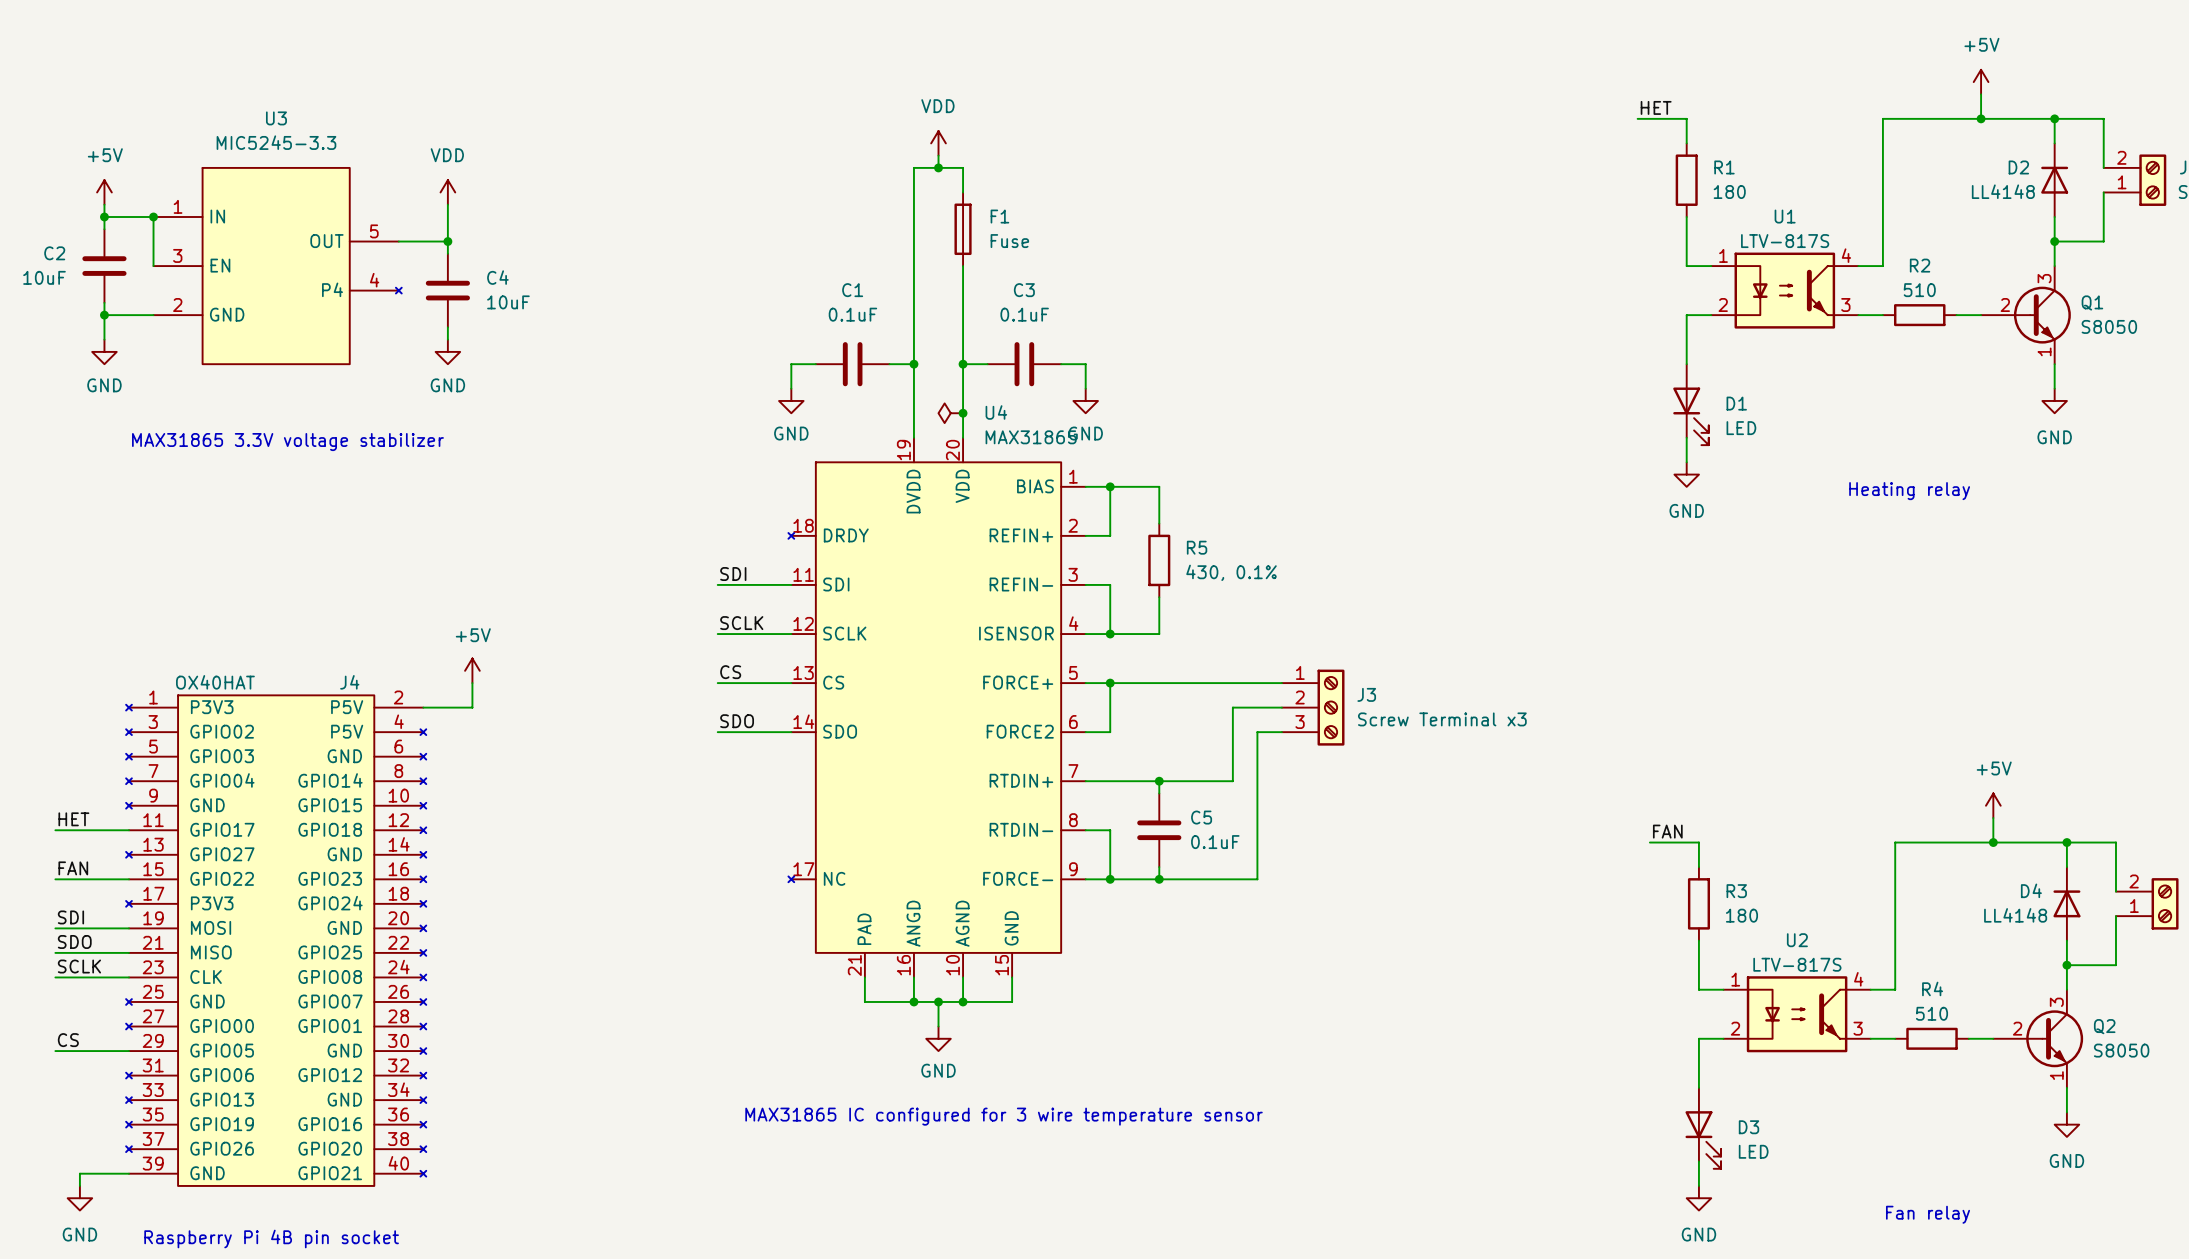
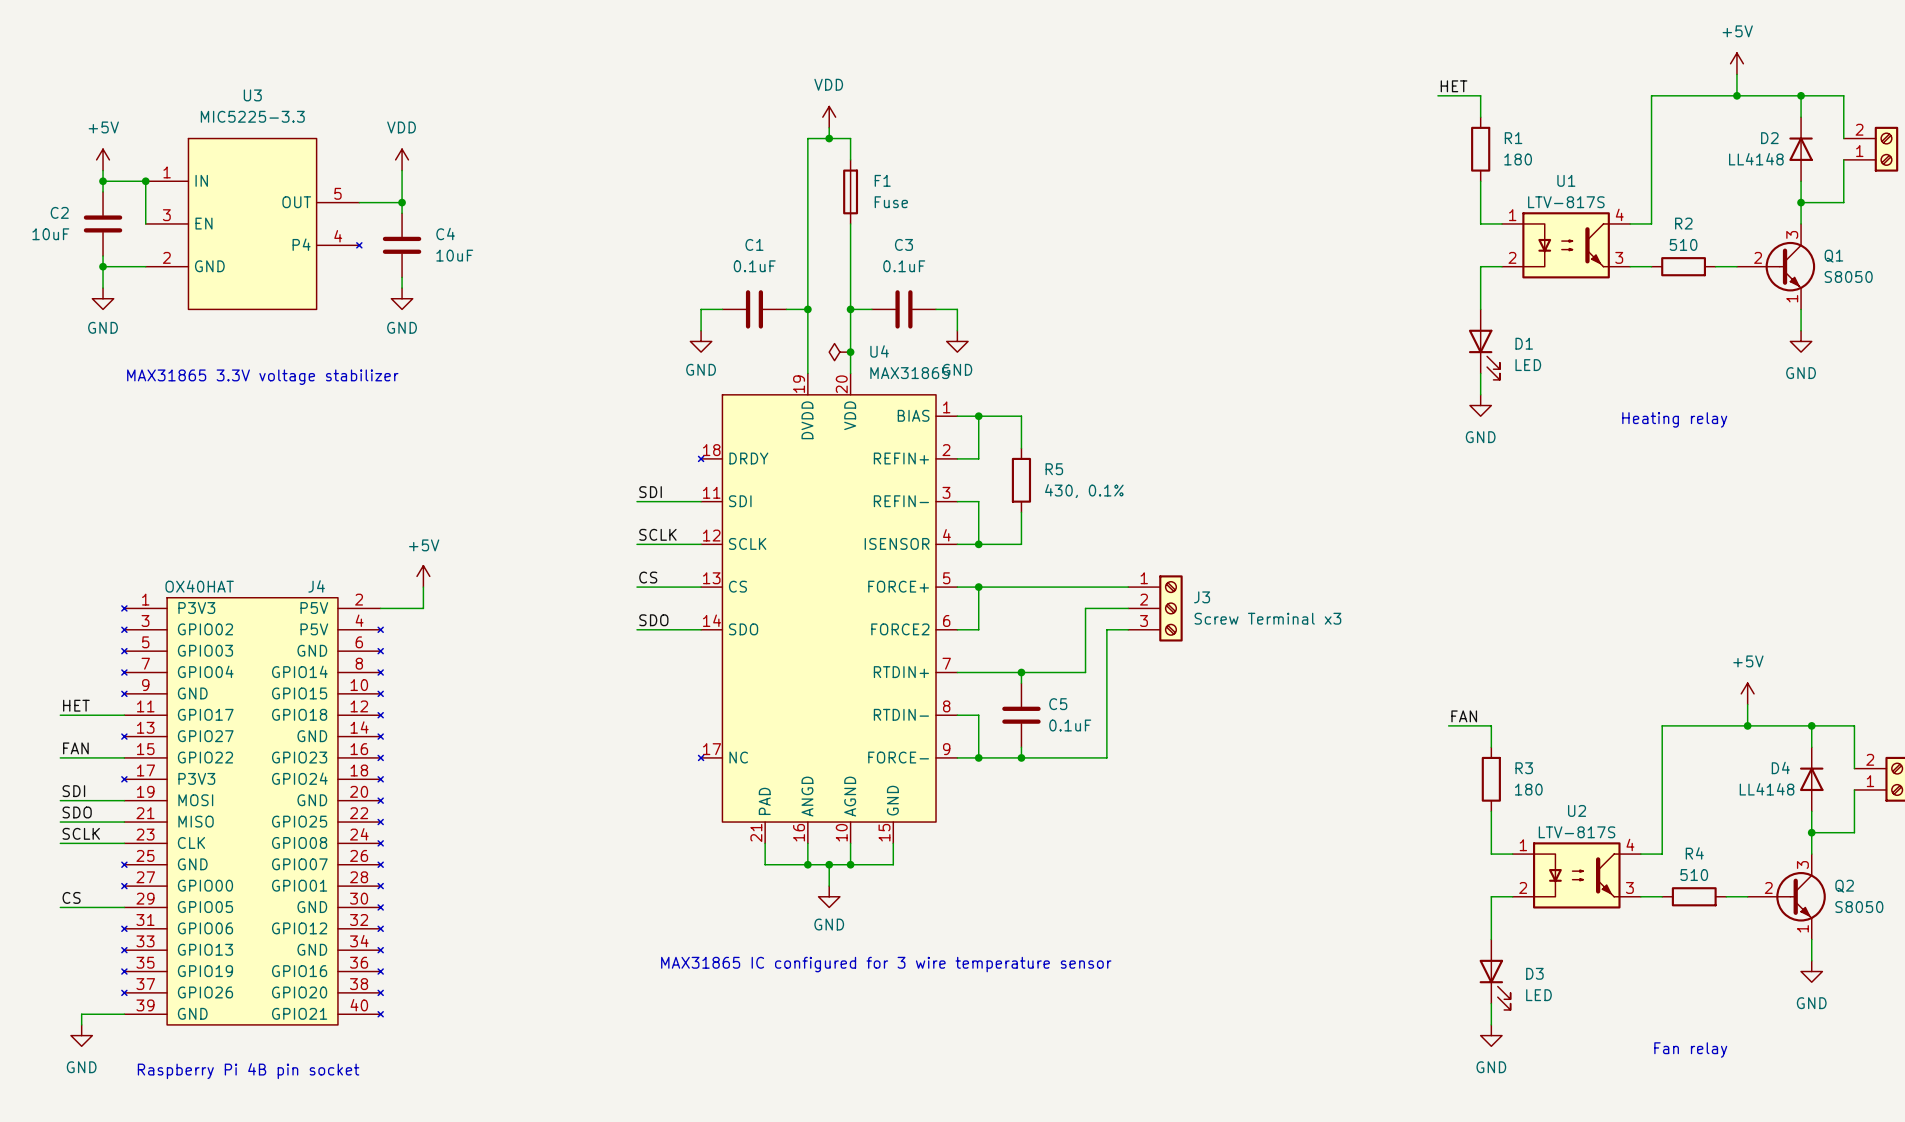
U3 value: MIC5245-3.3 (276, 142) -> MIC5225-3.3 (252, 116)

